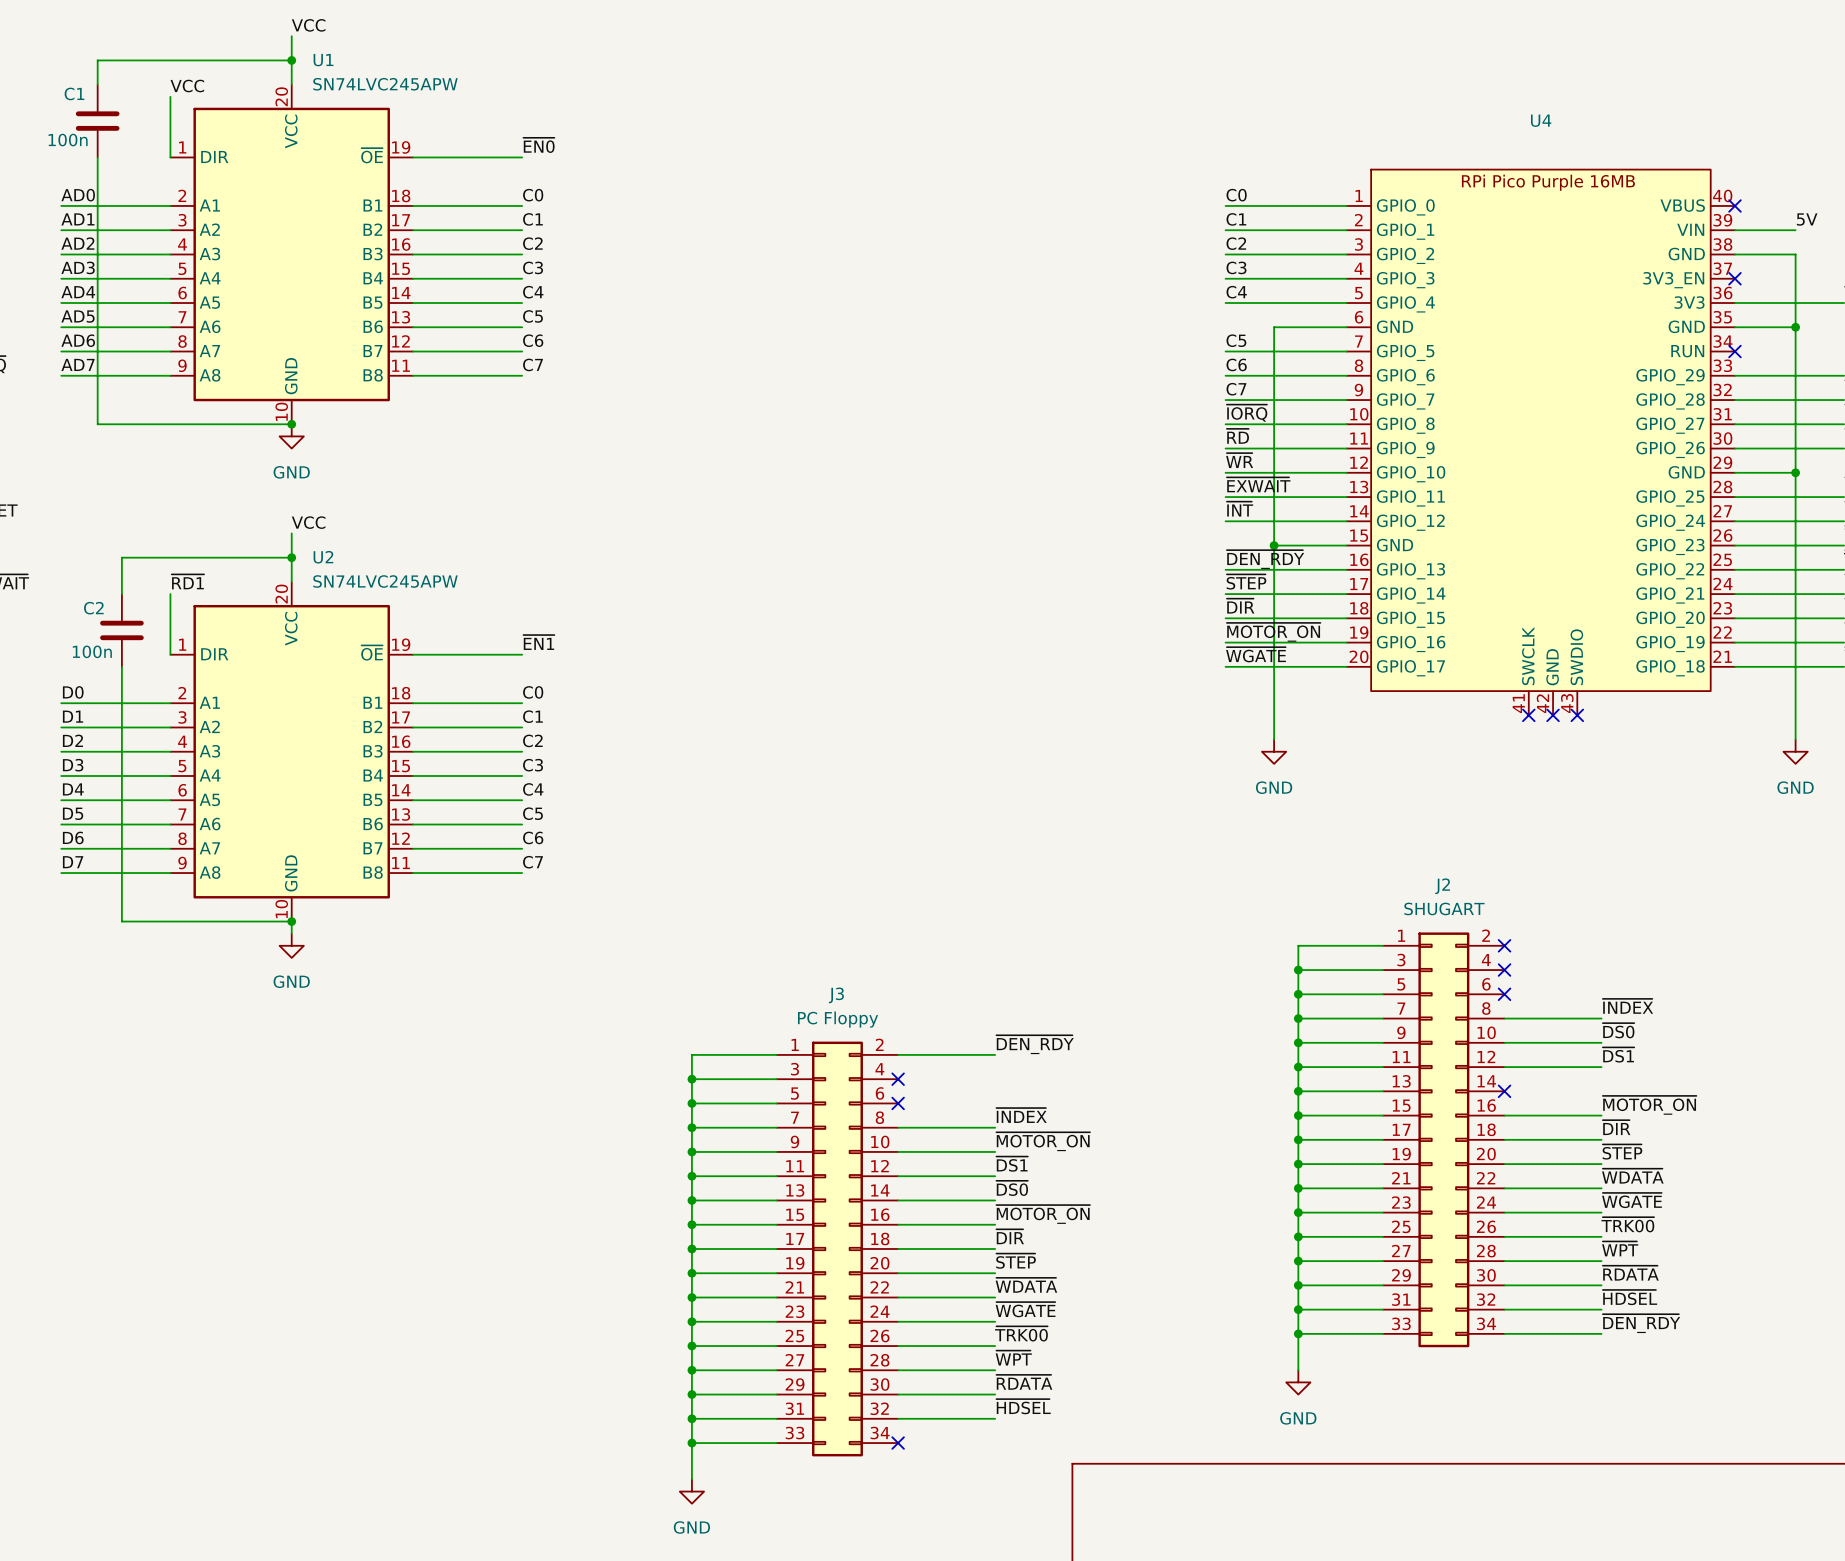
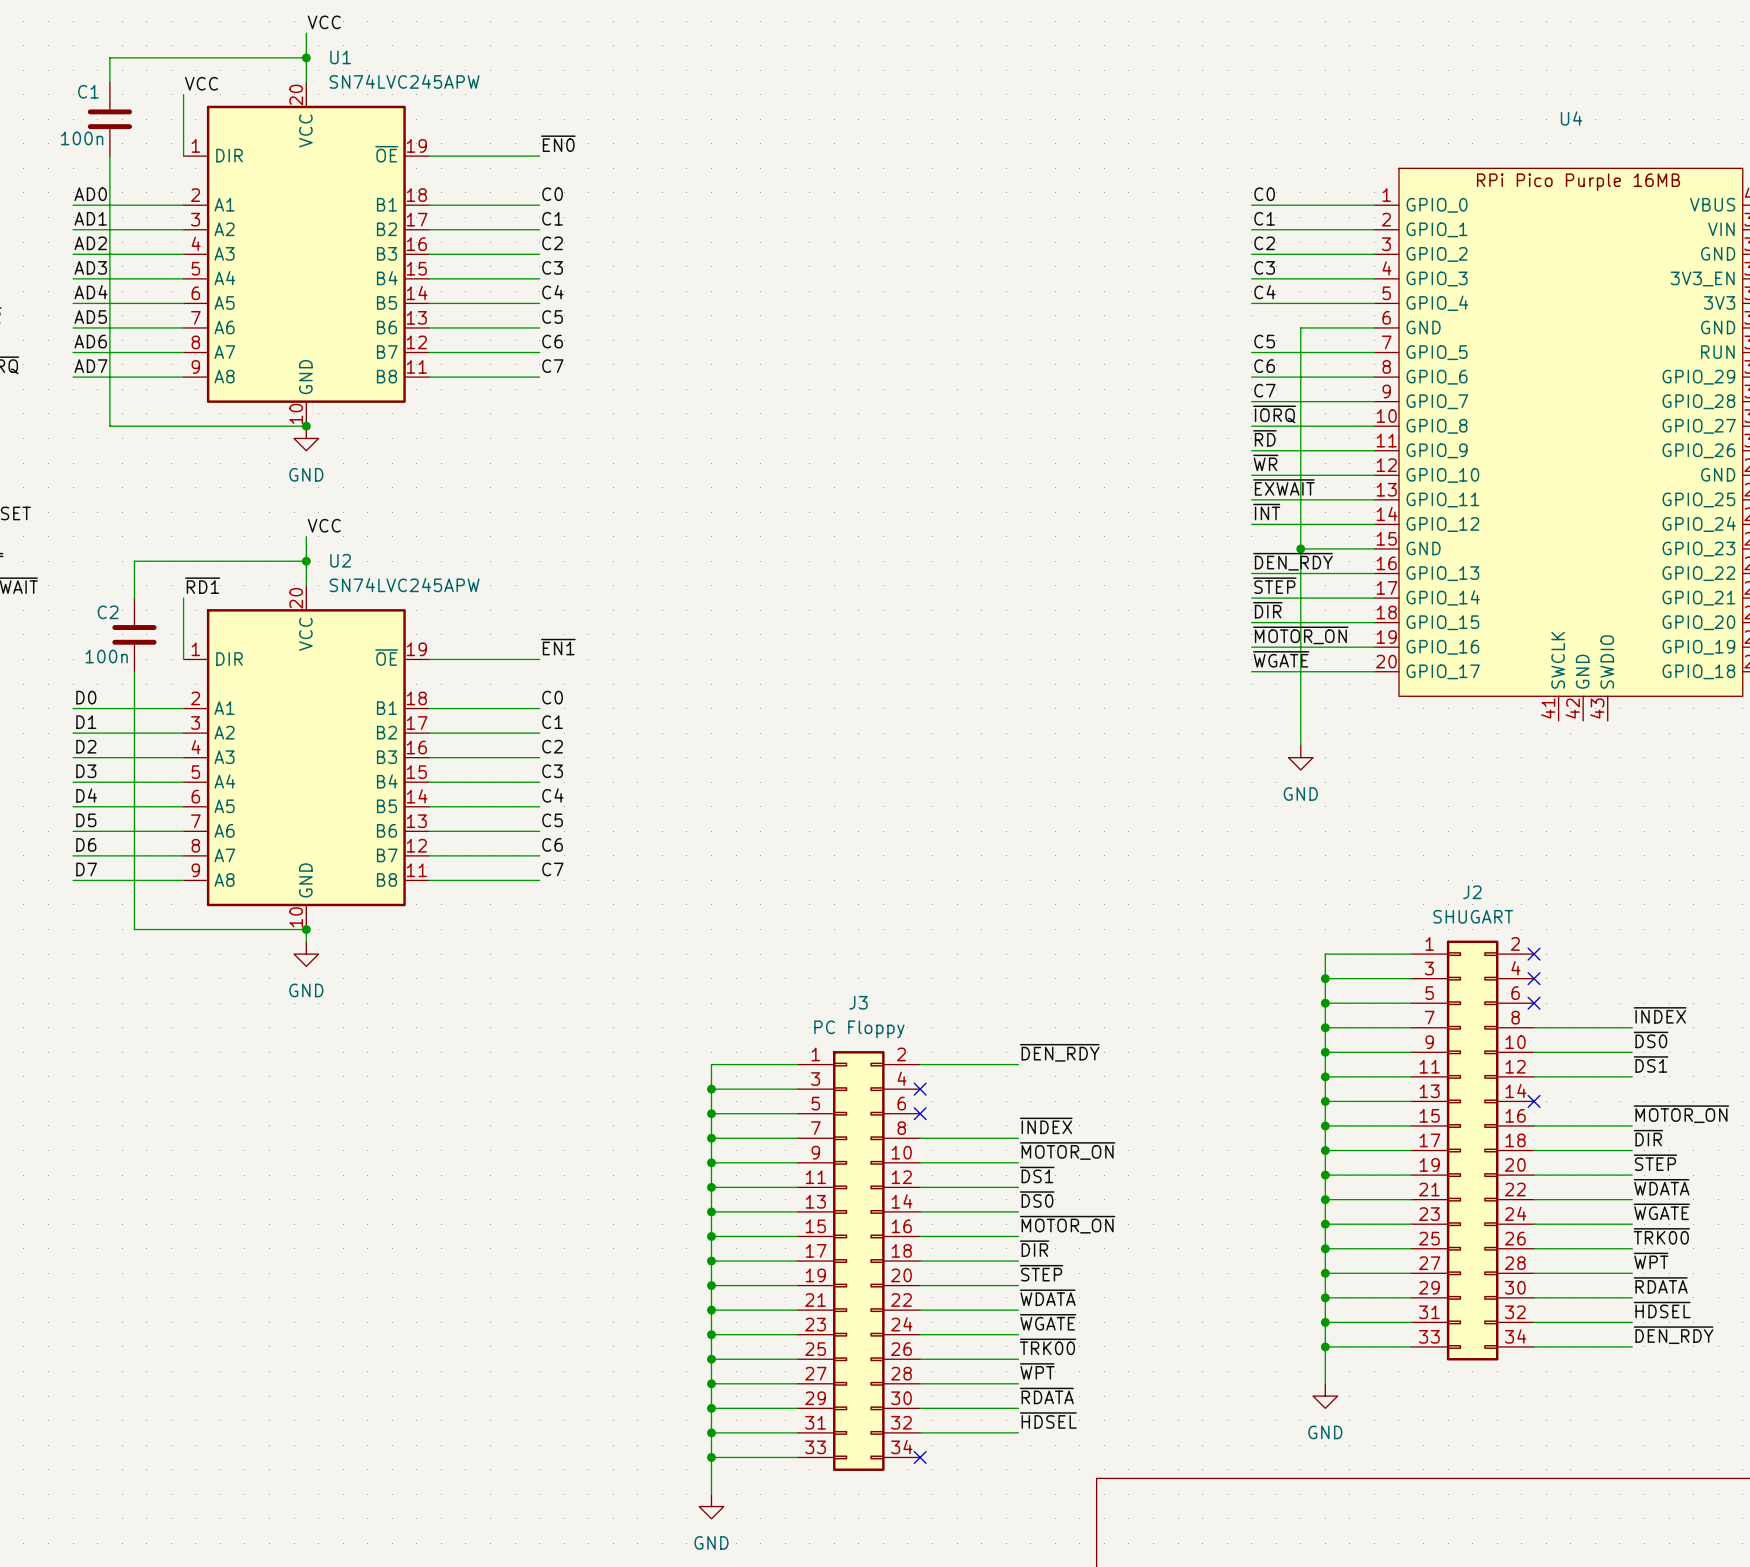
no-connect mark: (1528, 715) -> none
no-connect mark: (1553, 715) -> none
no-connect mark: (1577, 715) -> none

